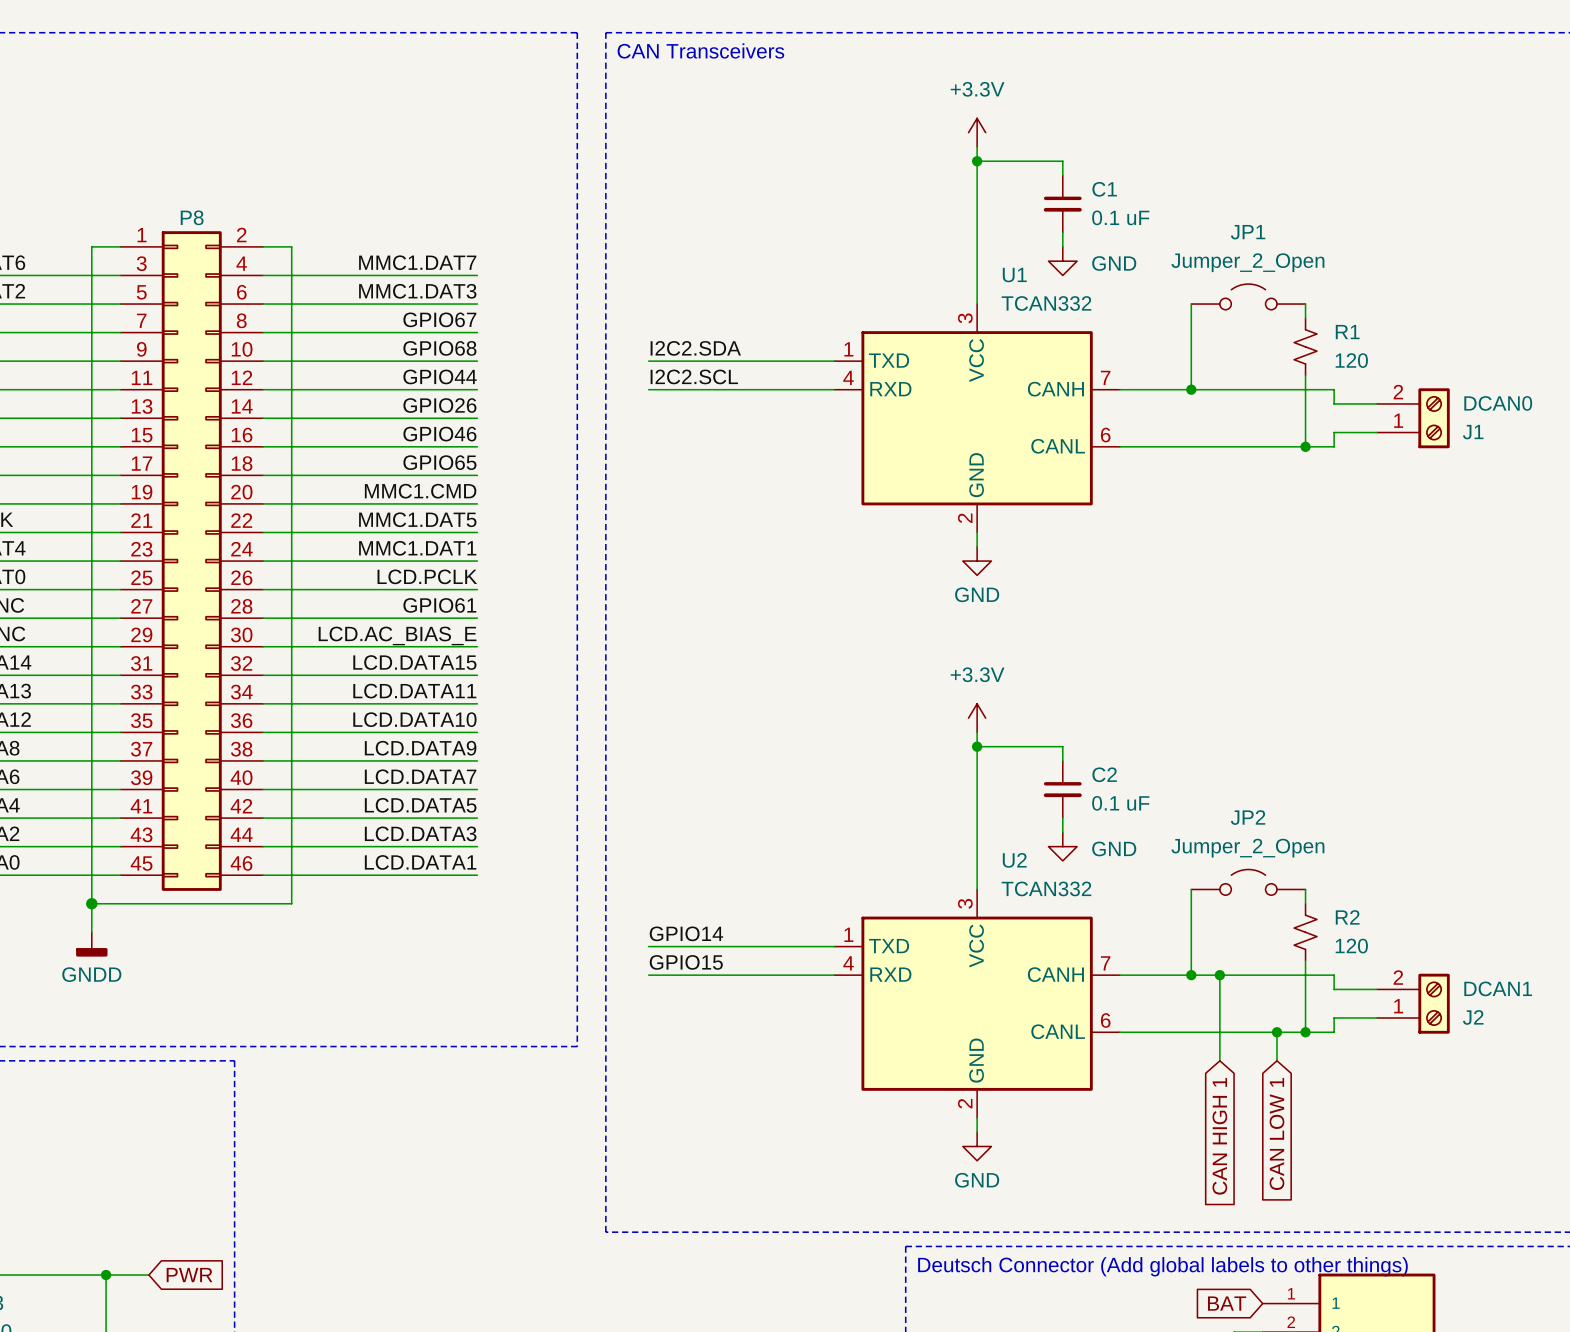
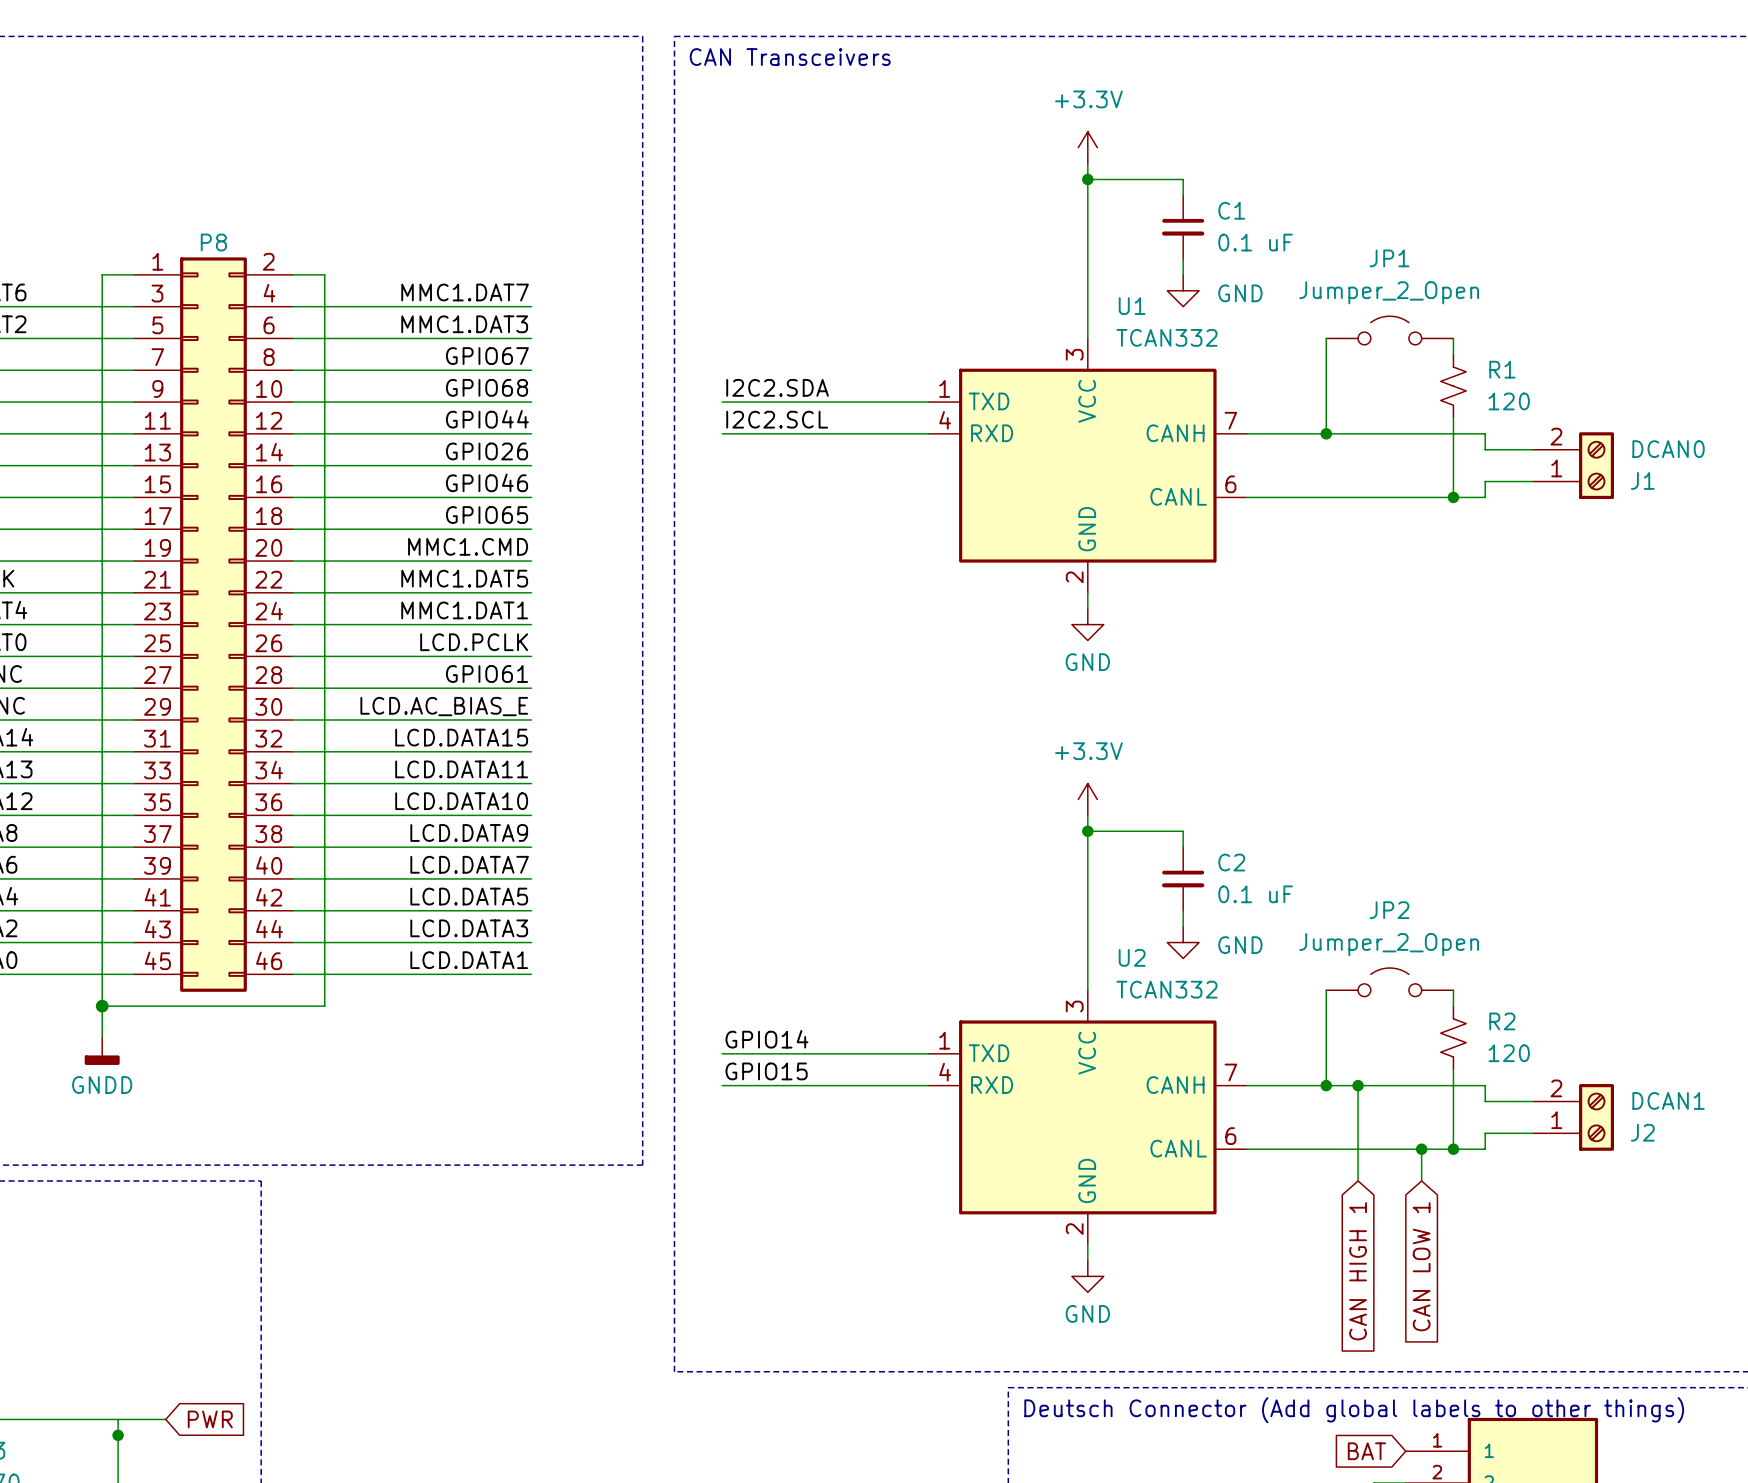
junction position: (106, 1275) -> (118, 1435)

